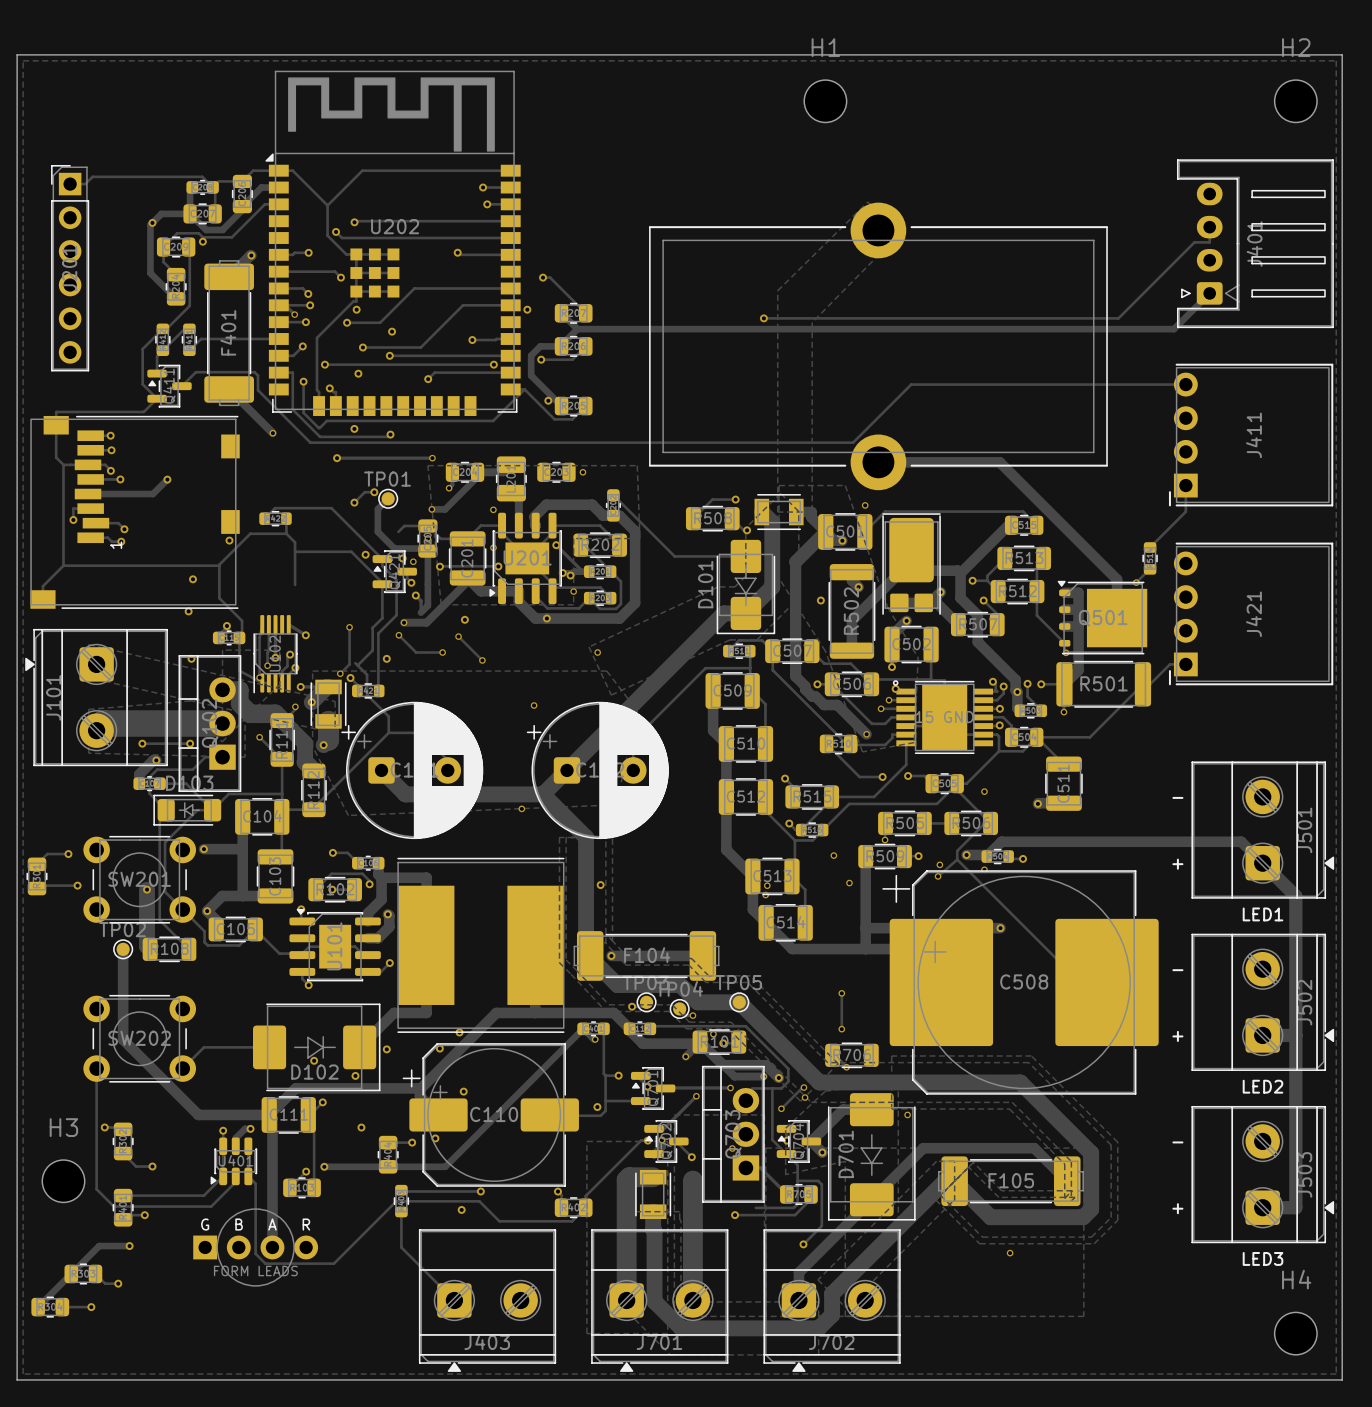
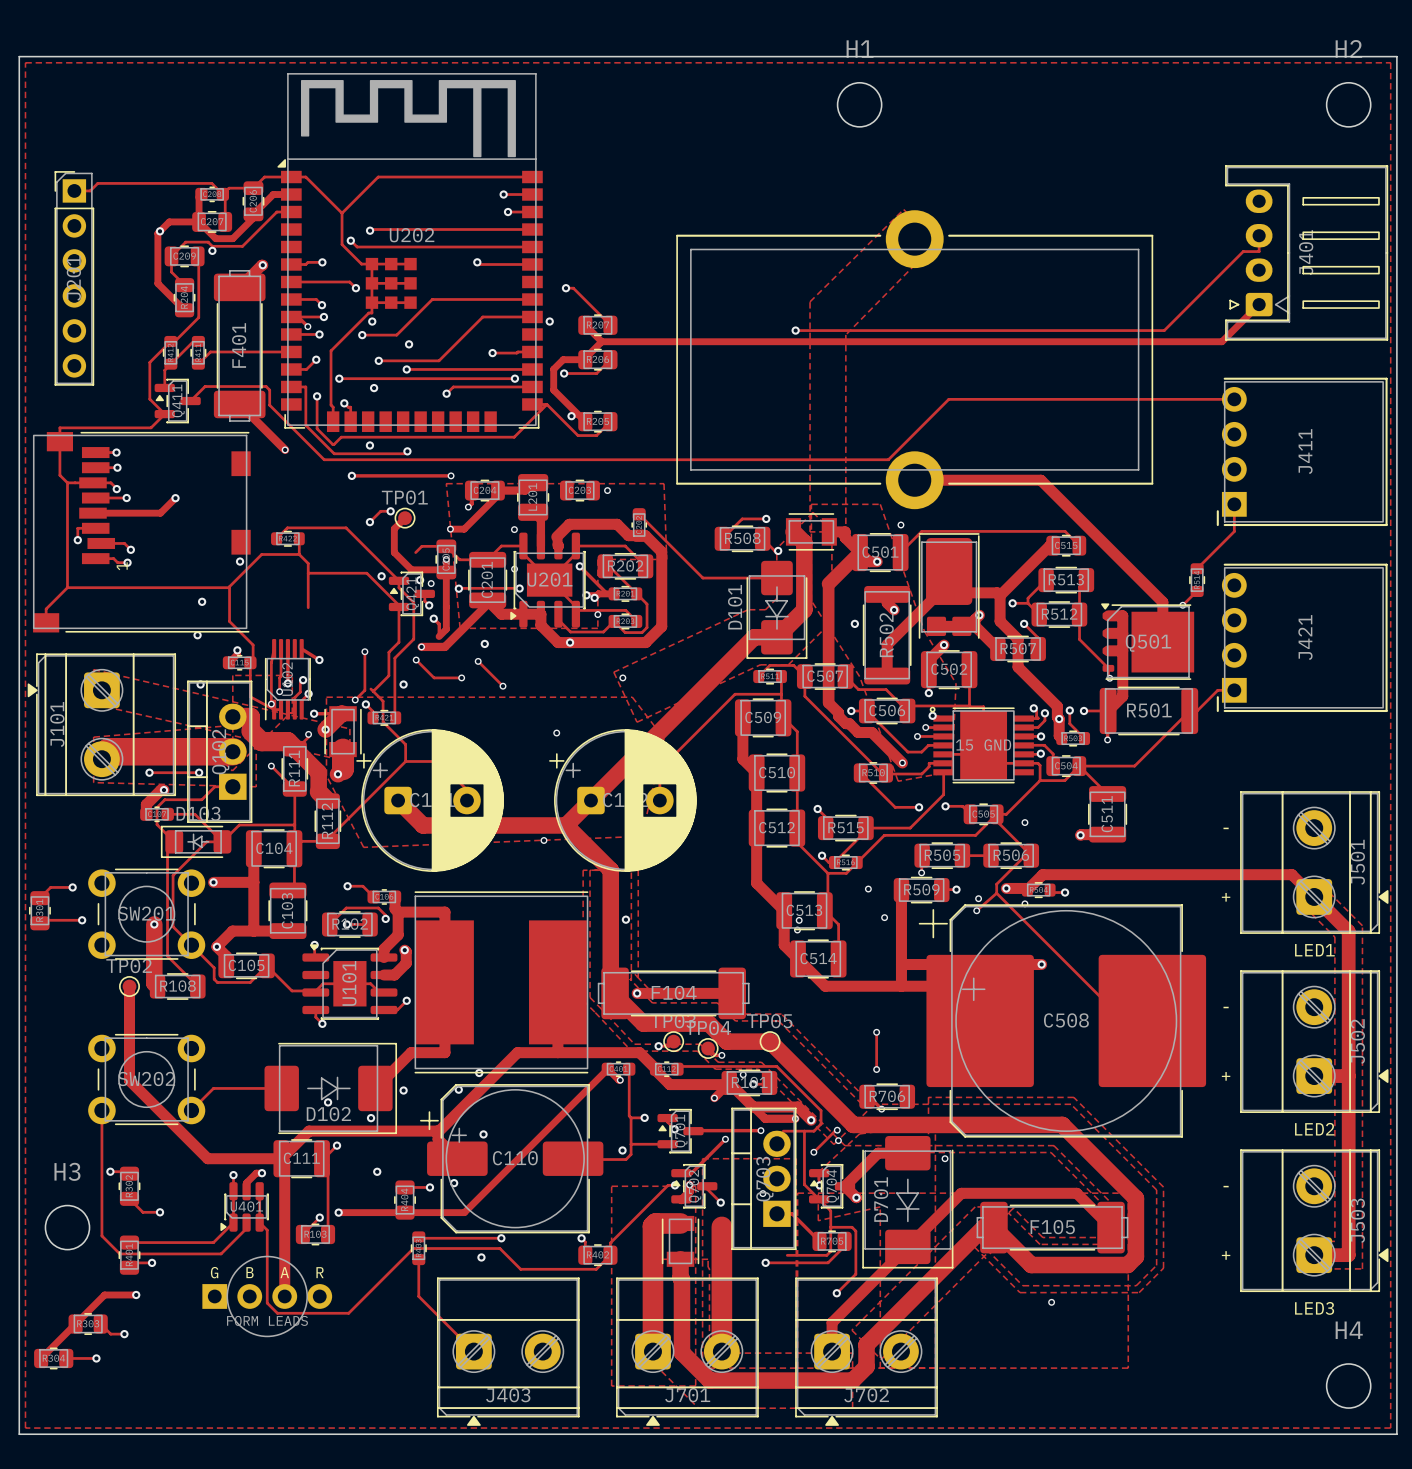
zone outline: none -> (1323, 887) (1362, 925) (1362, 1268) (1314, 1268) (1314, 1241) (1334, 1241) (1334, 937) (1304, 906) (1323, 887)

